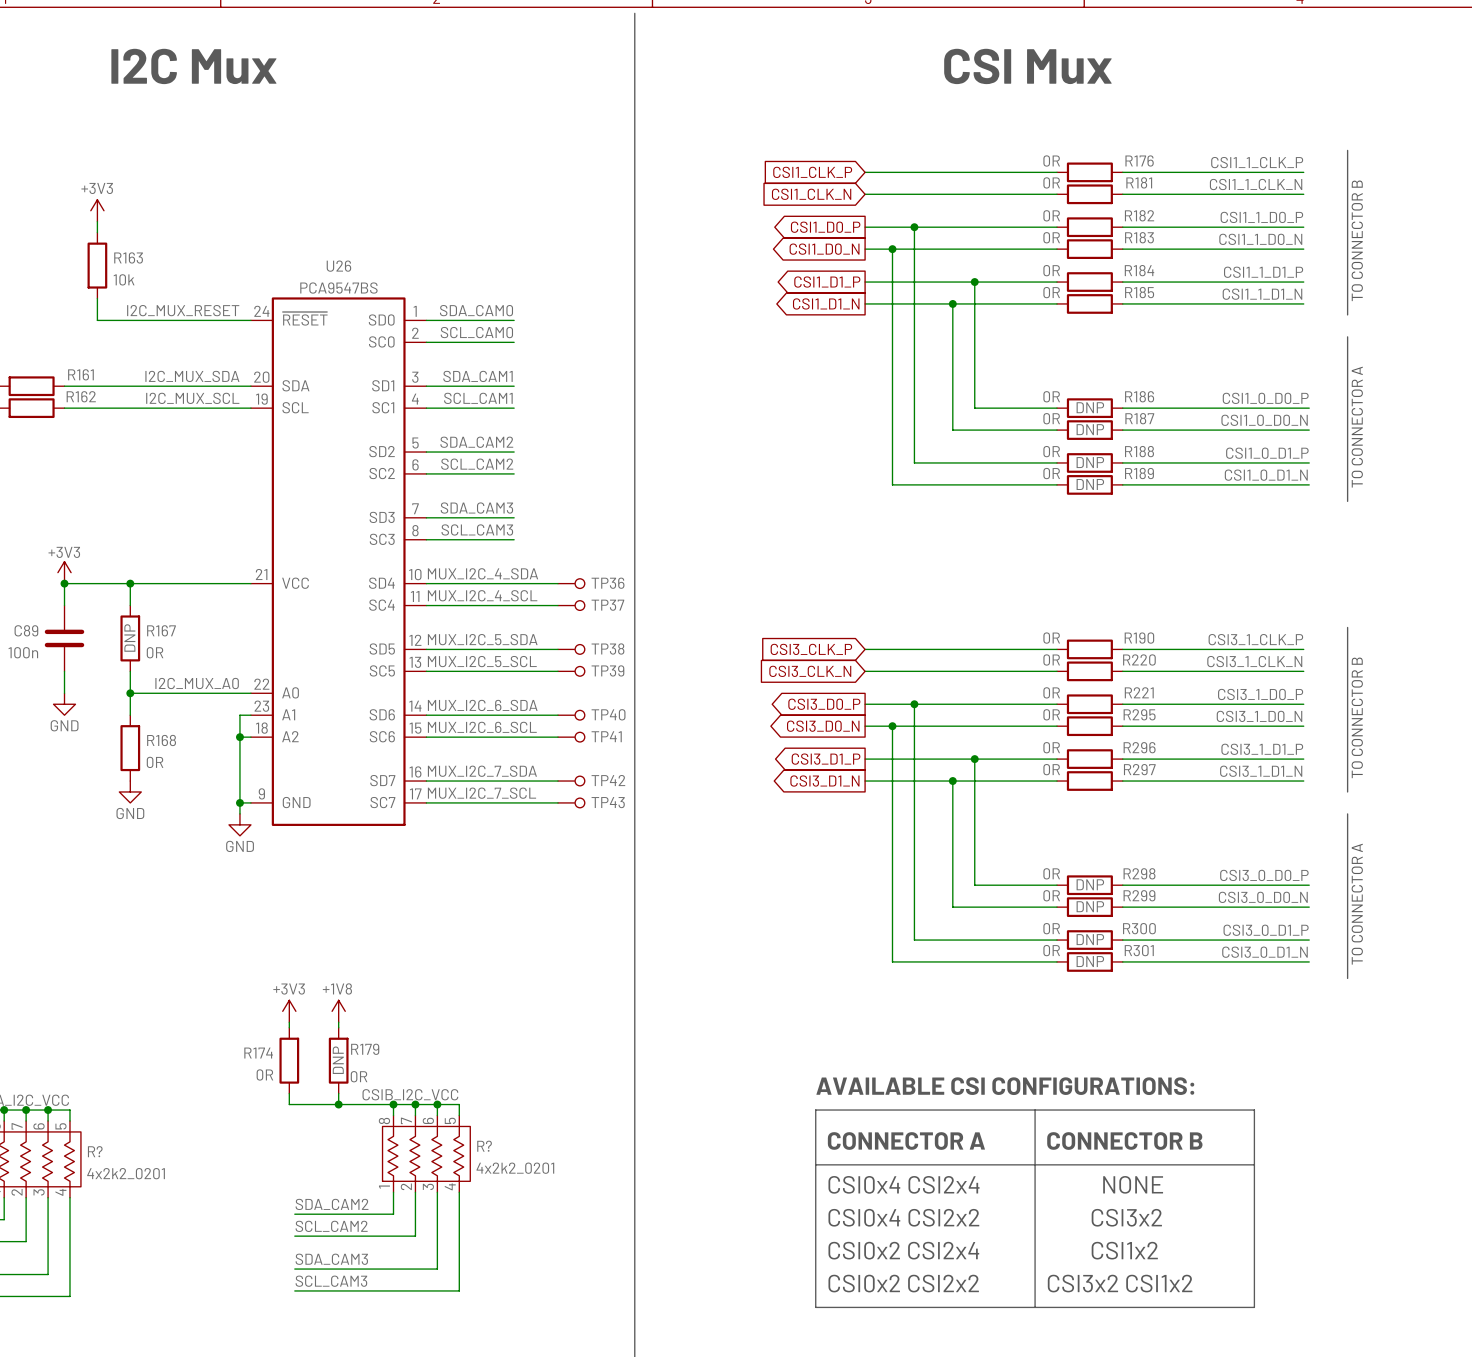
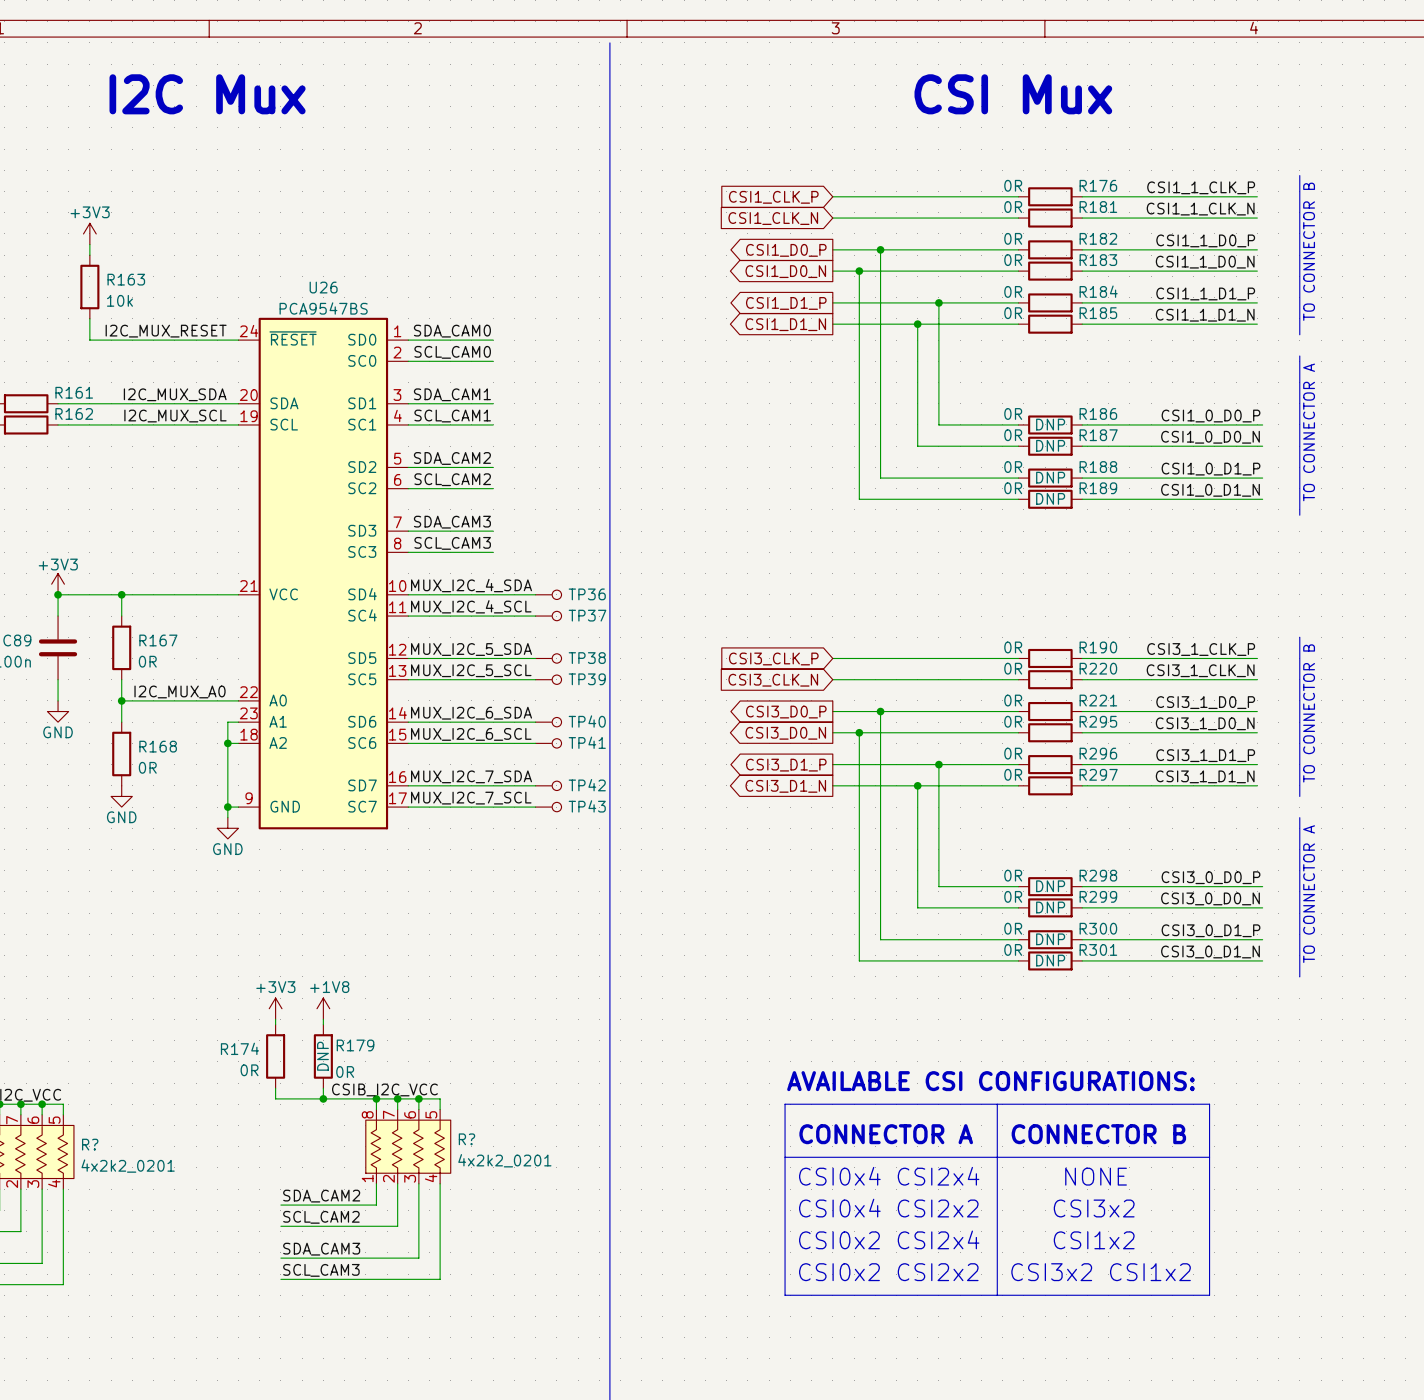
R167 text: DNP (129, 638) -> none

